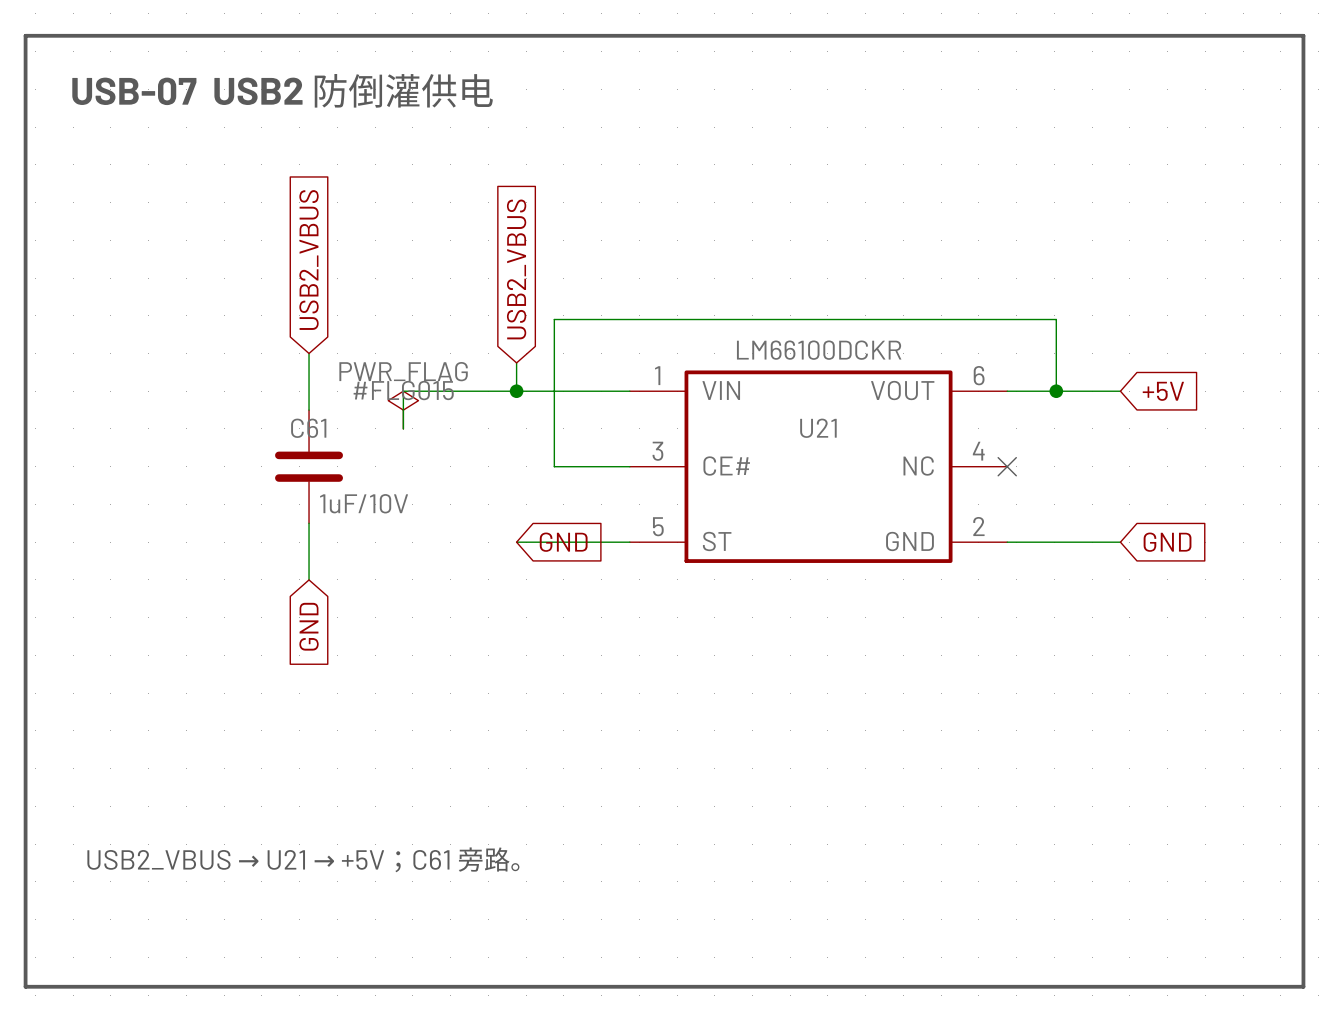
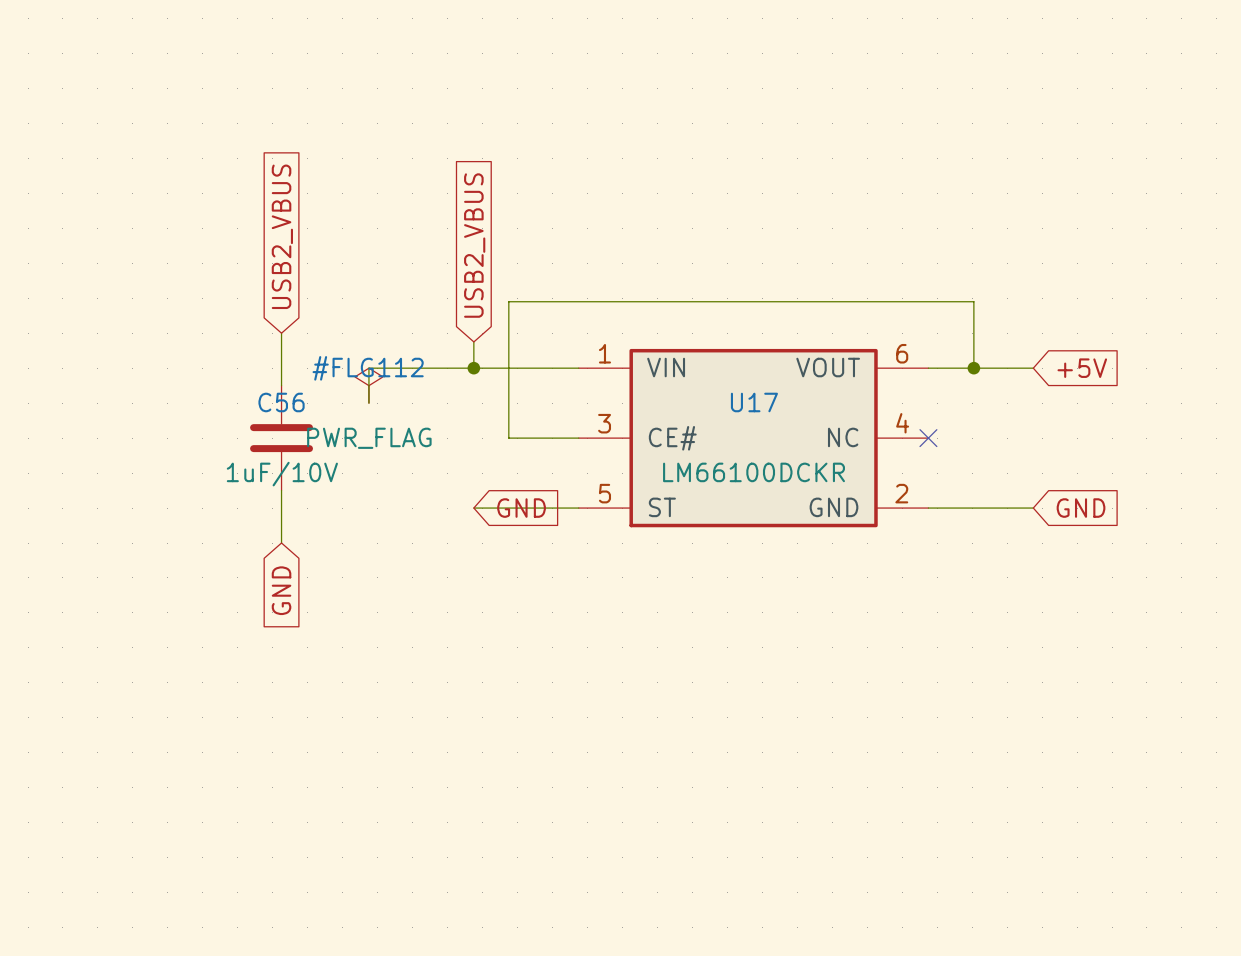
line: (25, 35) (1303, 35) (1303, 986) (25, 986) (25, 35) -> none
text: USB-07 USB2 防倒灌供电 (282, 90) -> none
U21 value position: LM66100DCKR (819, 350) -> LM66100DCKR (754, 472)
#FLG015 text position: PWR_FLAG (403, 371) -> PWR_FLAG (369, 438)
#FLG015 name: #FLG015 (403, 390) -> #FLG112 (368, 368)
C61 name: C61 (308, 428) -> C56 (281, 402)
U21 name: U21 (818, 428) -> U17 (754, 402)
C61 value position: 1uF/10V (364, 503) -> 1uF/10V (282, 474)
text: USB2_VBUS → U21 → +5V；C61 旁路。 (303, 859) -> none

